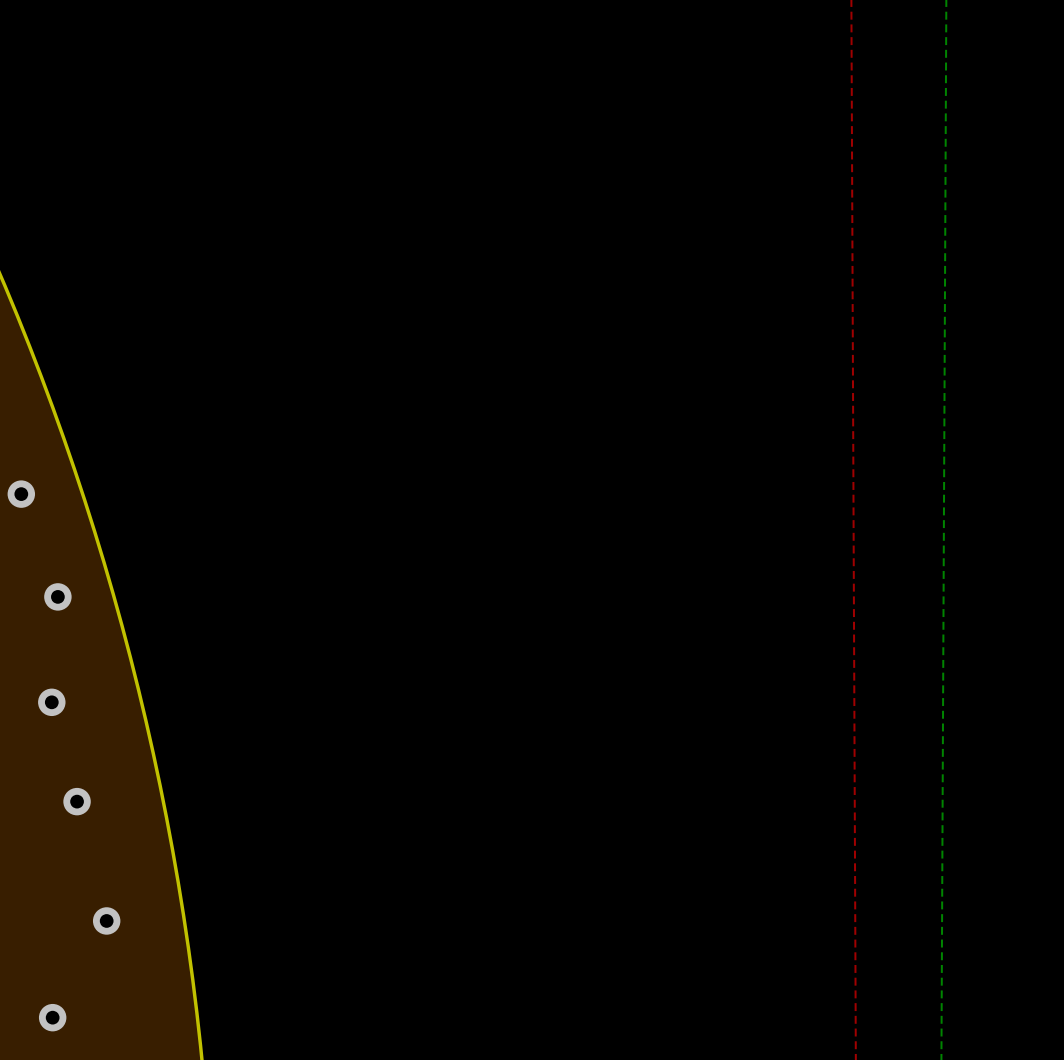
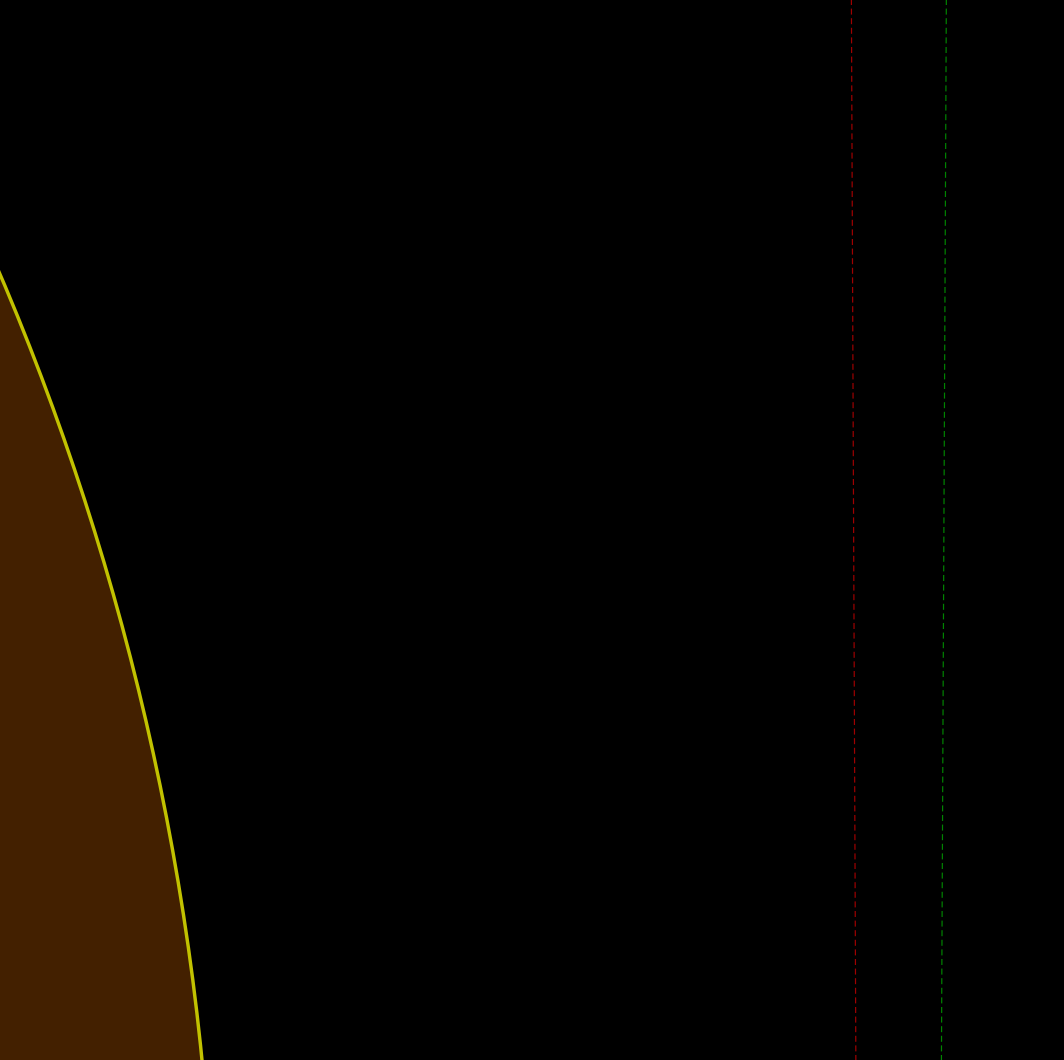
via: (21, 494) -> none
via: (57, 596) -> none
via: (51, 702) -> none
via: (77, 801) -> none
via: (106, 920) -> none
via: (52, 1017) -> none

